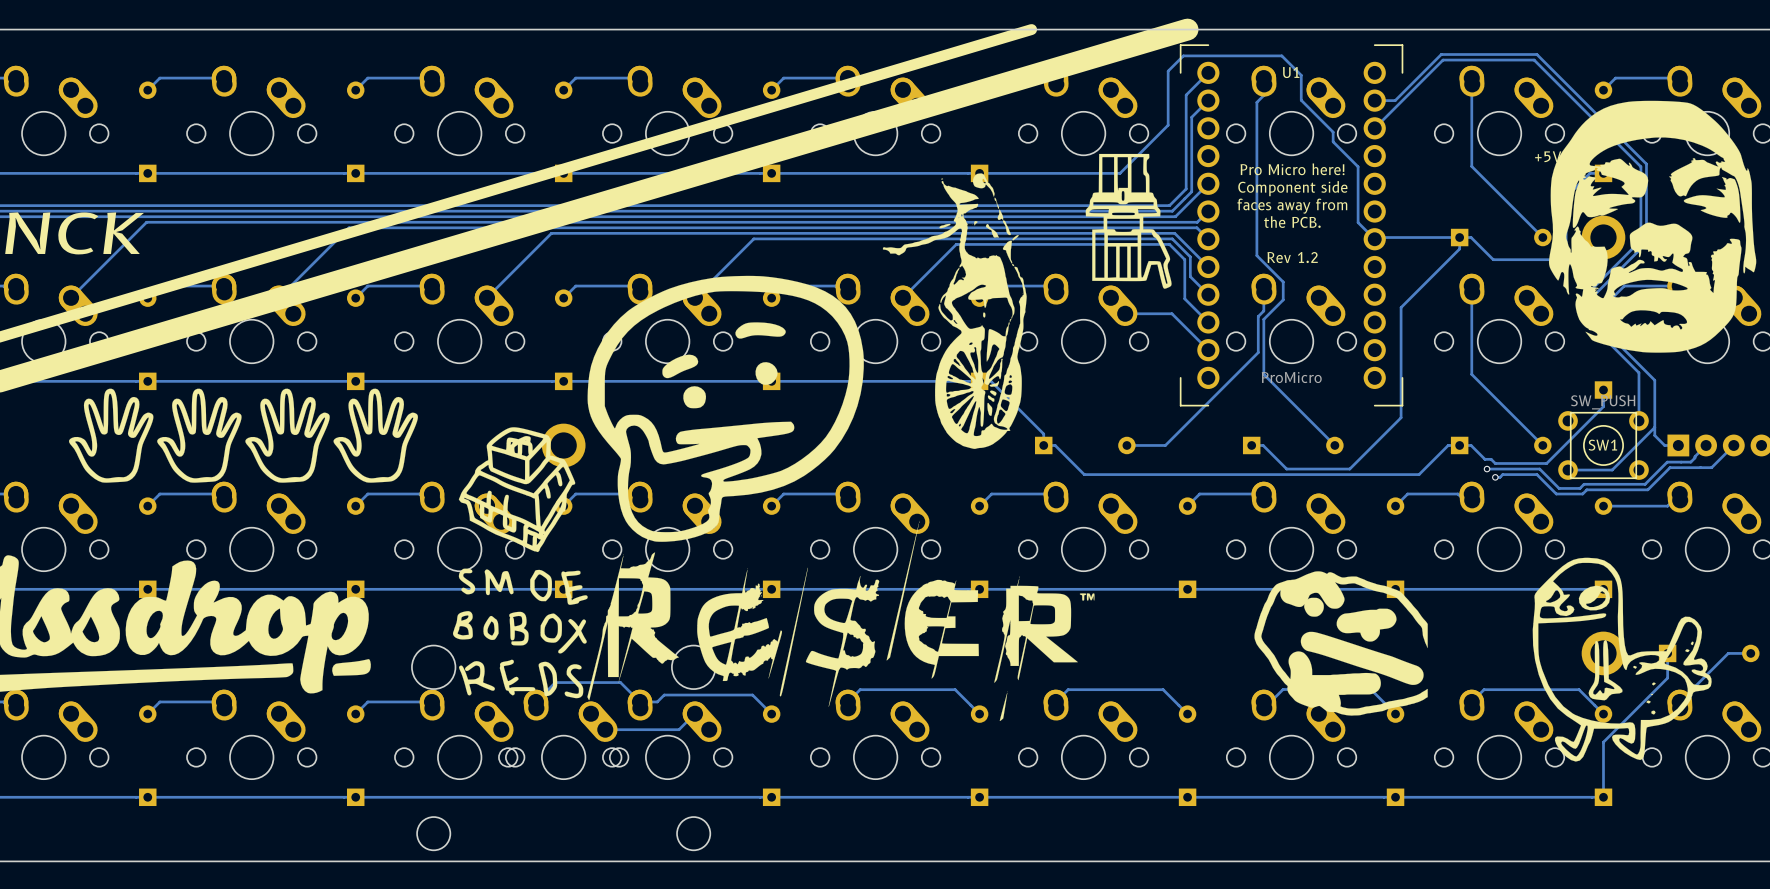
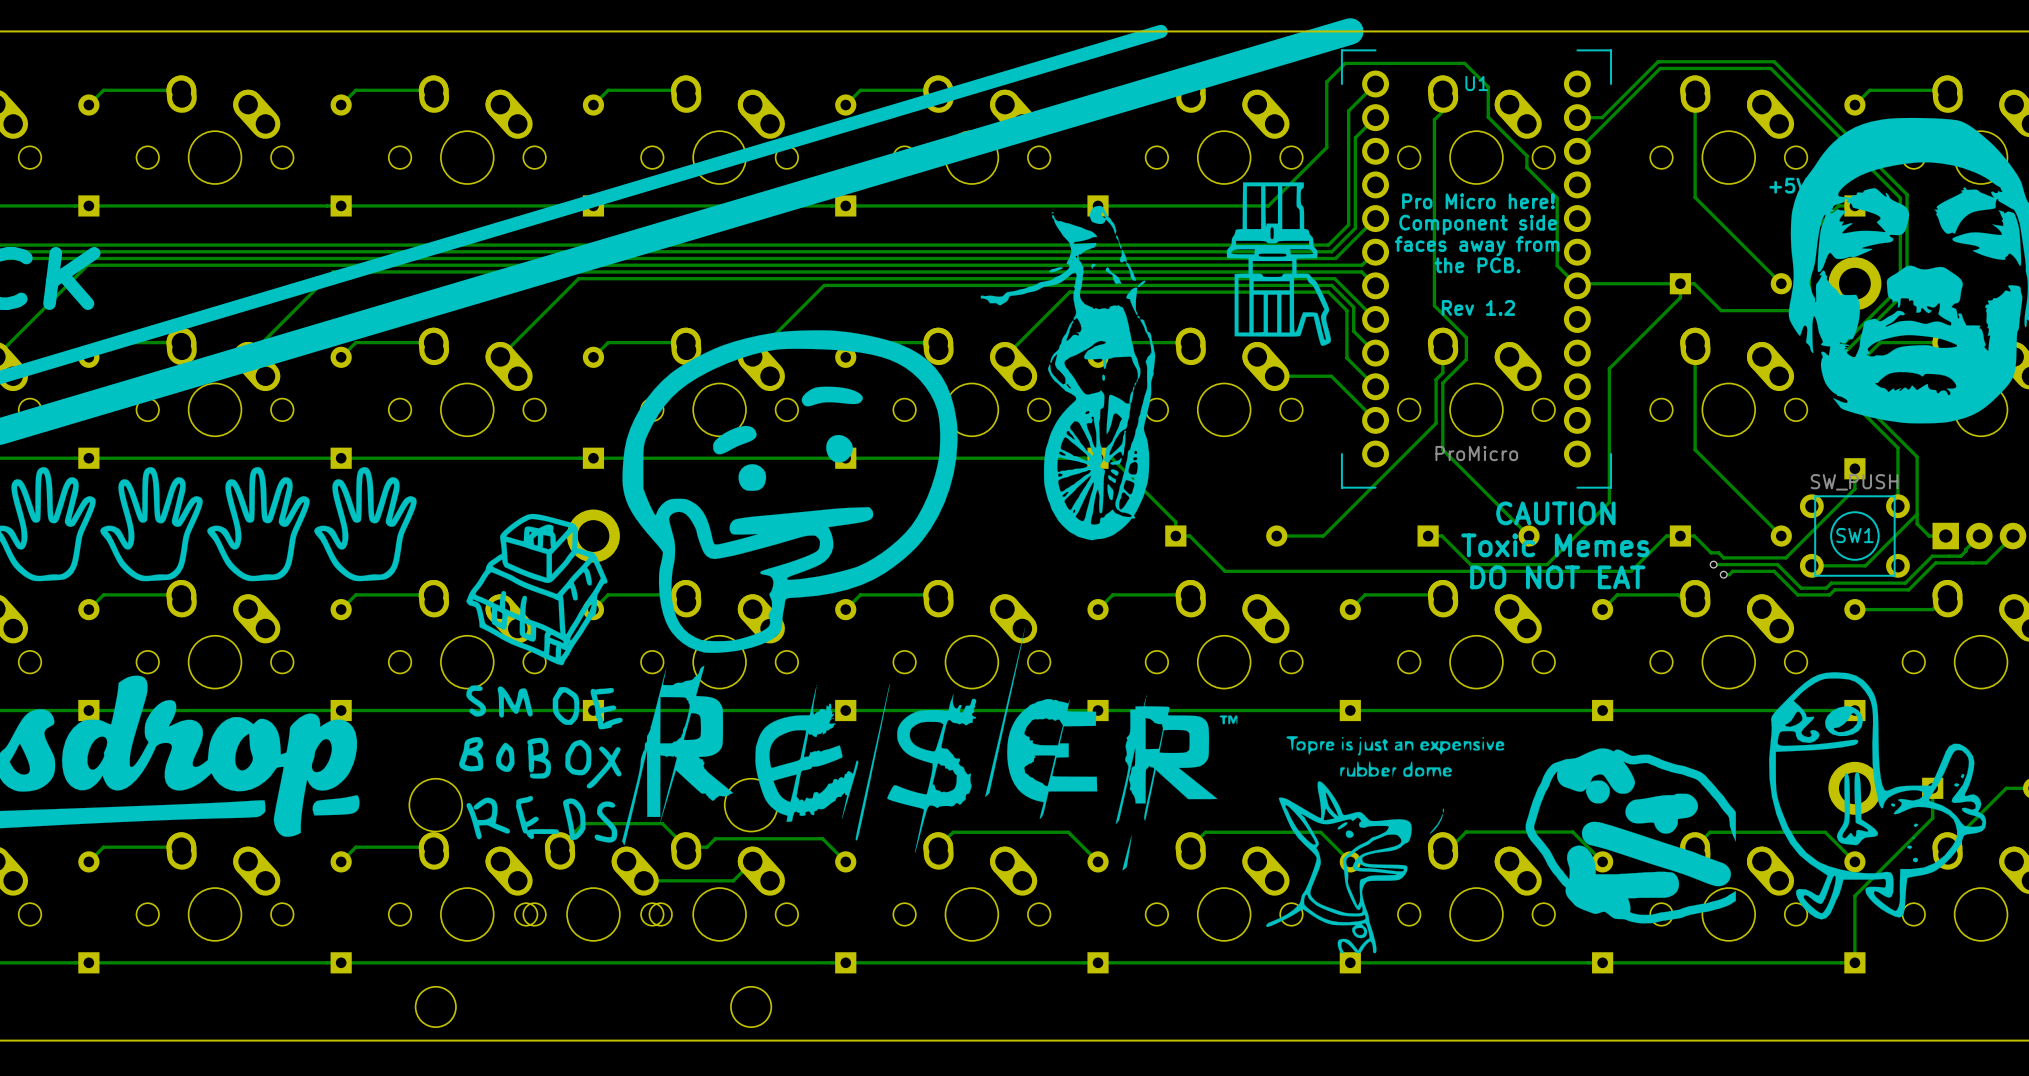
text: none -> CAUTION (1555, 513)
text: none -> Toxic Memes (1555, 545)
text: none -> DO NOT EAT (1557, 577)
drawing: none -> [1266, 736, 1505, 954]
drawing position: (1334, 632) -> (1622, 822)

